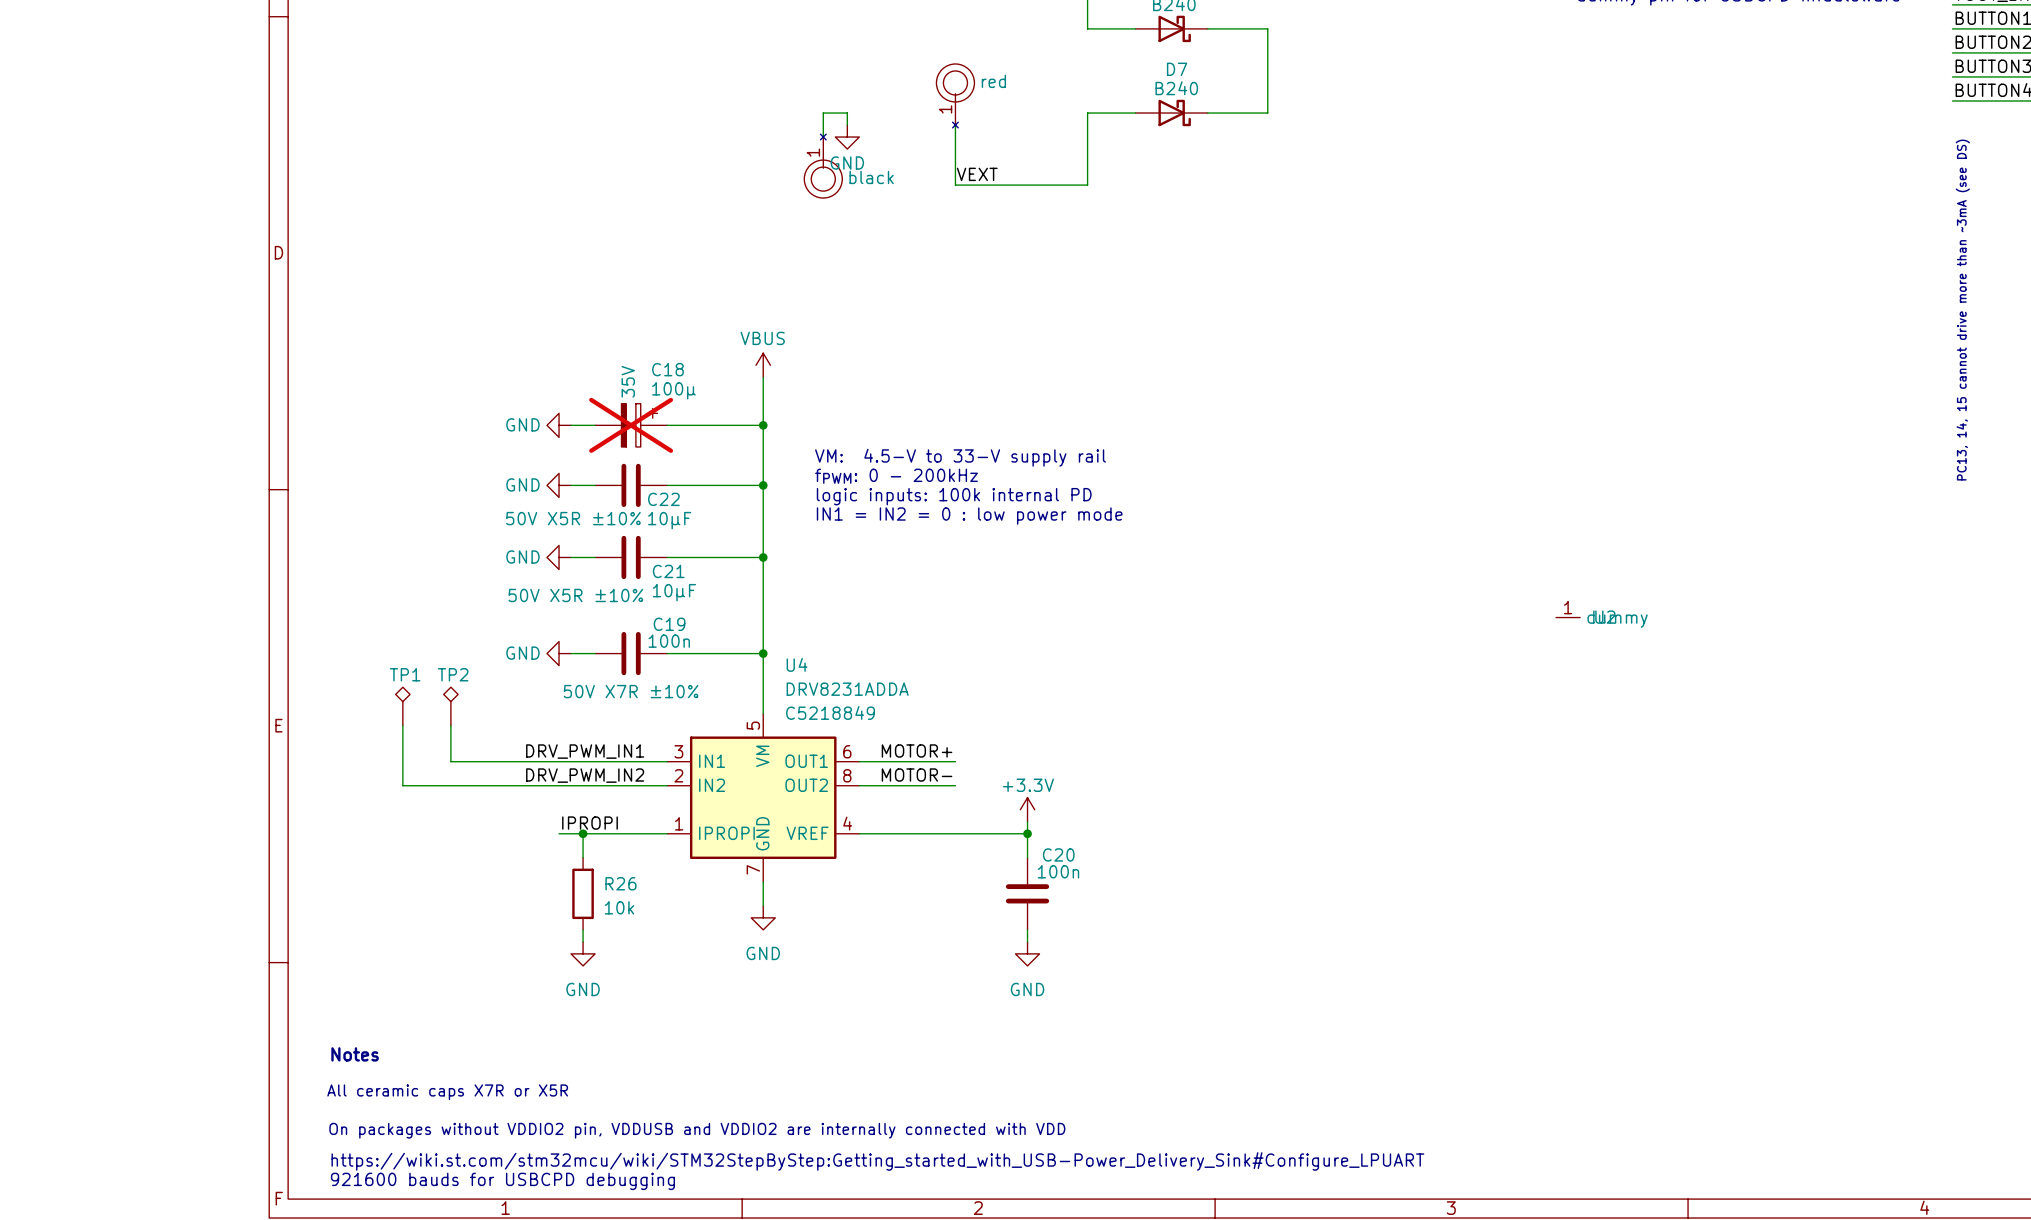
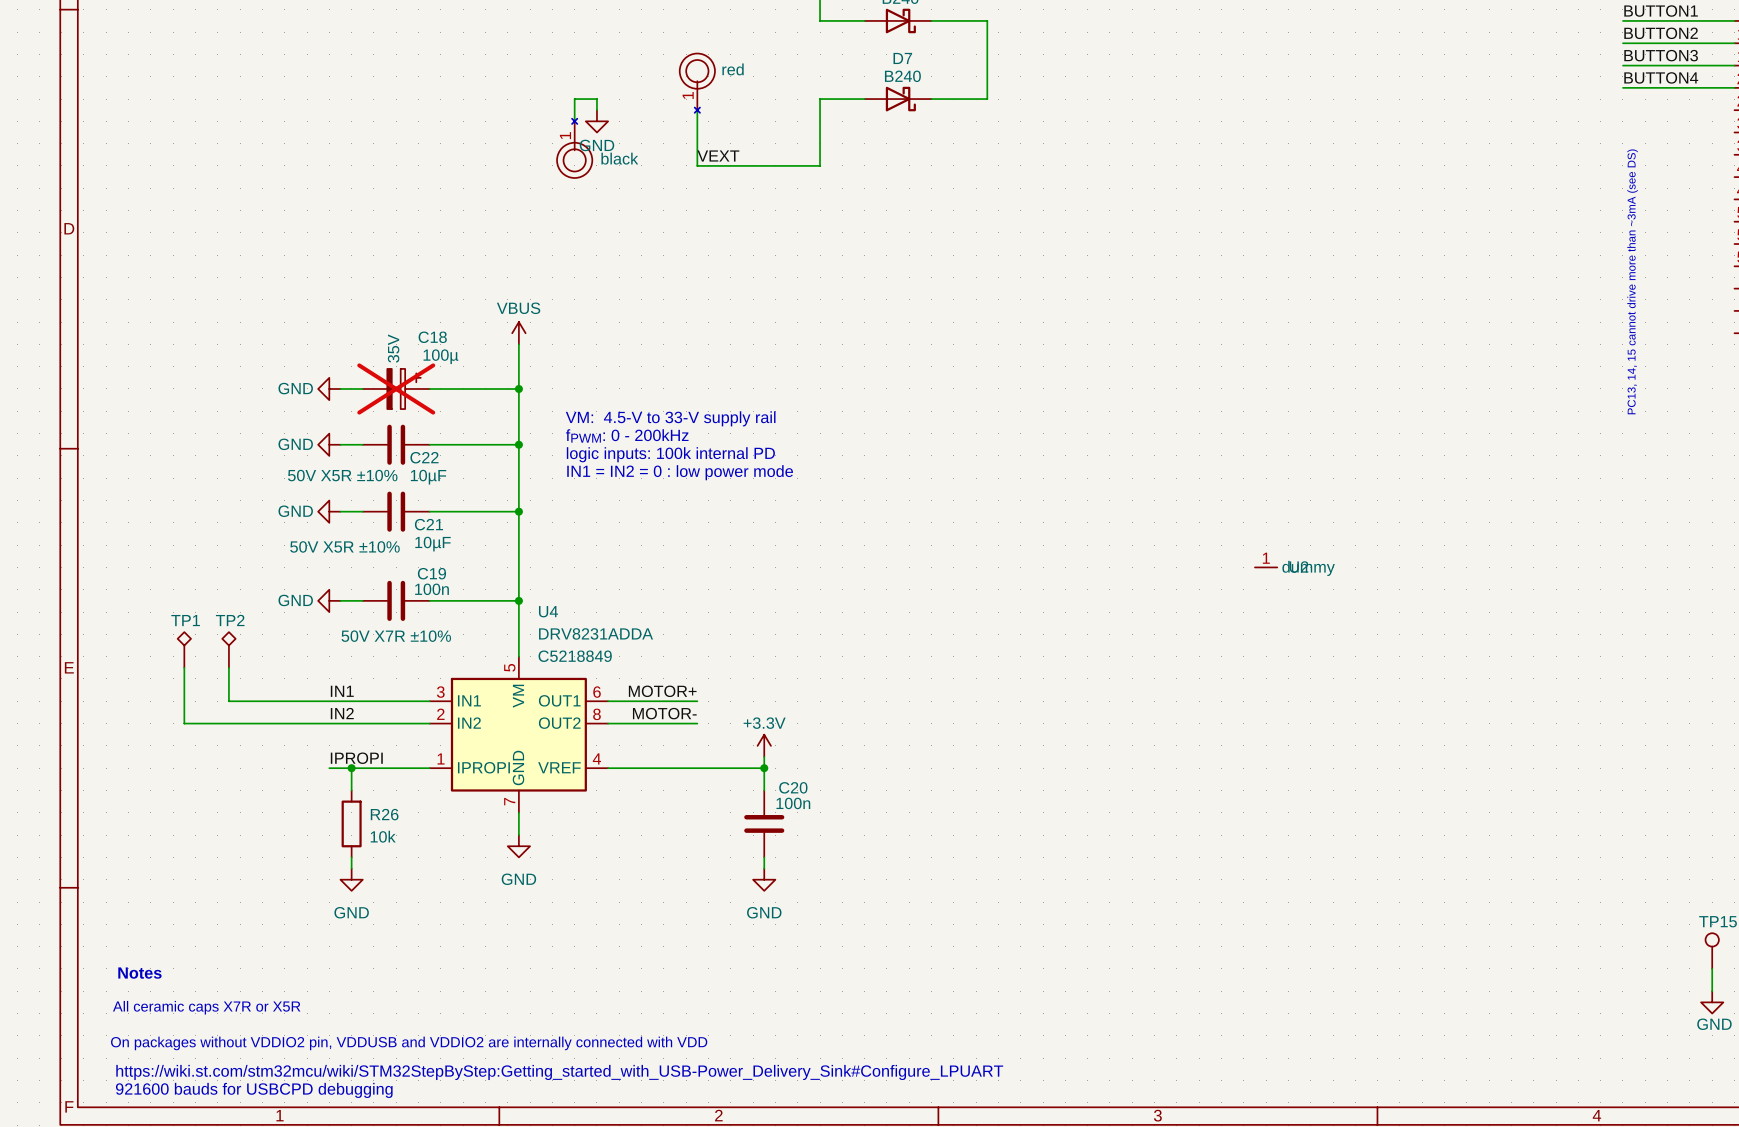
label: none -> IN1 (342, 691)
label: DRV_PWM_IN1 (585, 751) -> none
label: none -> IN2 (342, 713)
label: DRV_PWM_IN2 (585, 775) -> none

